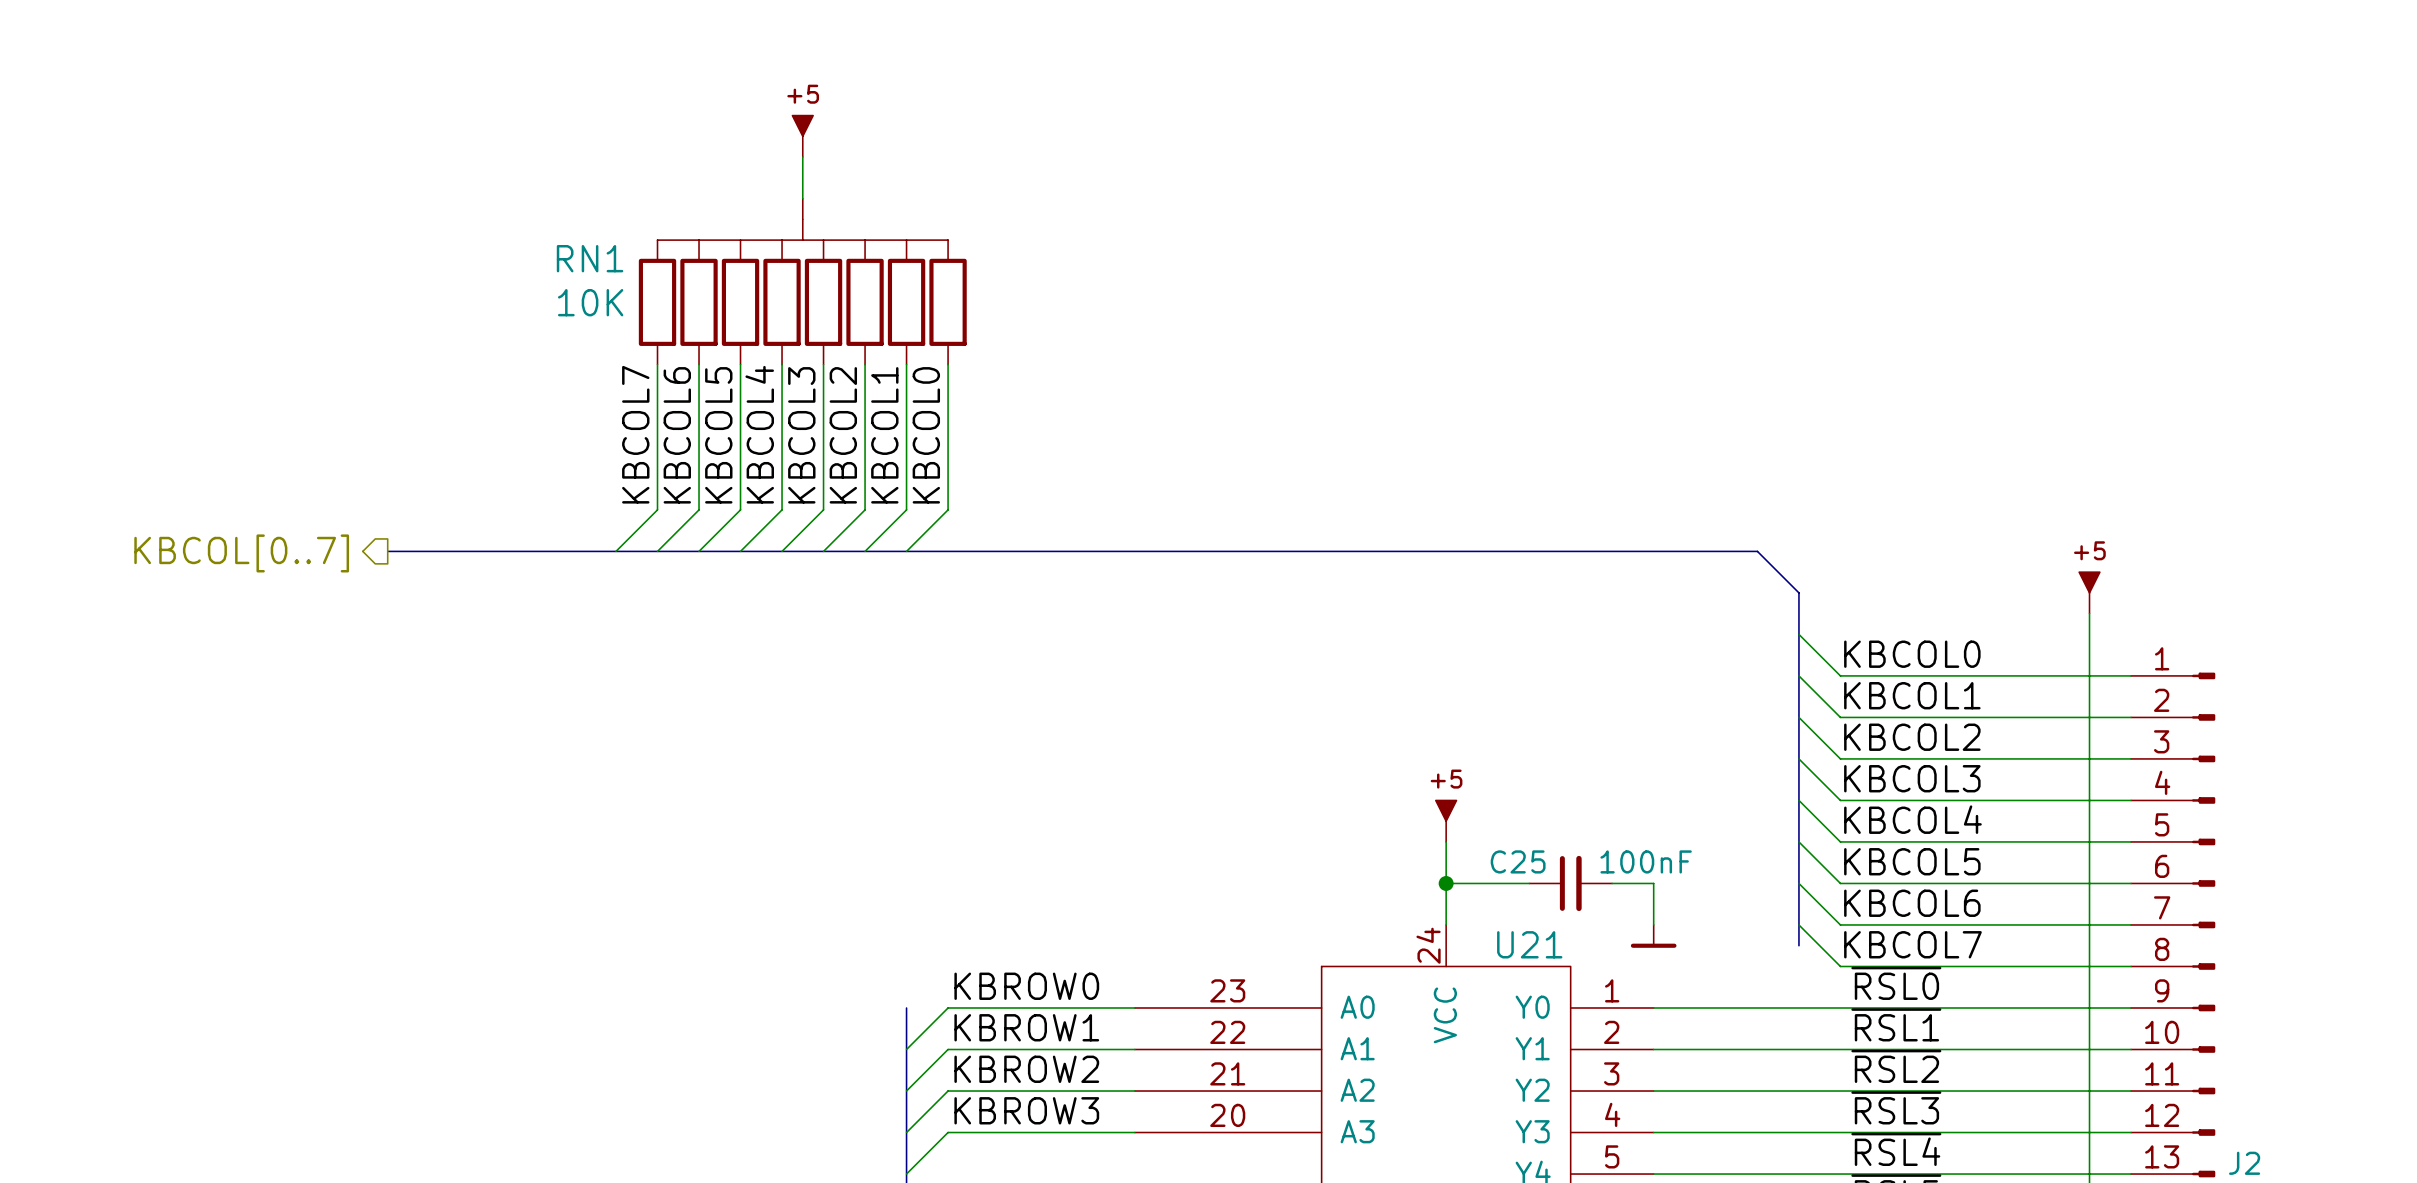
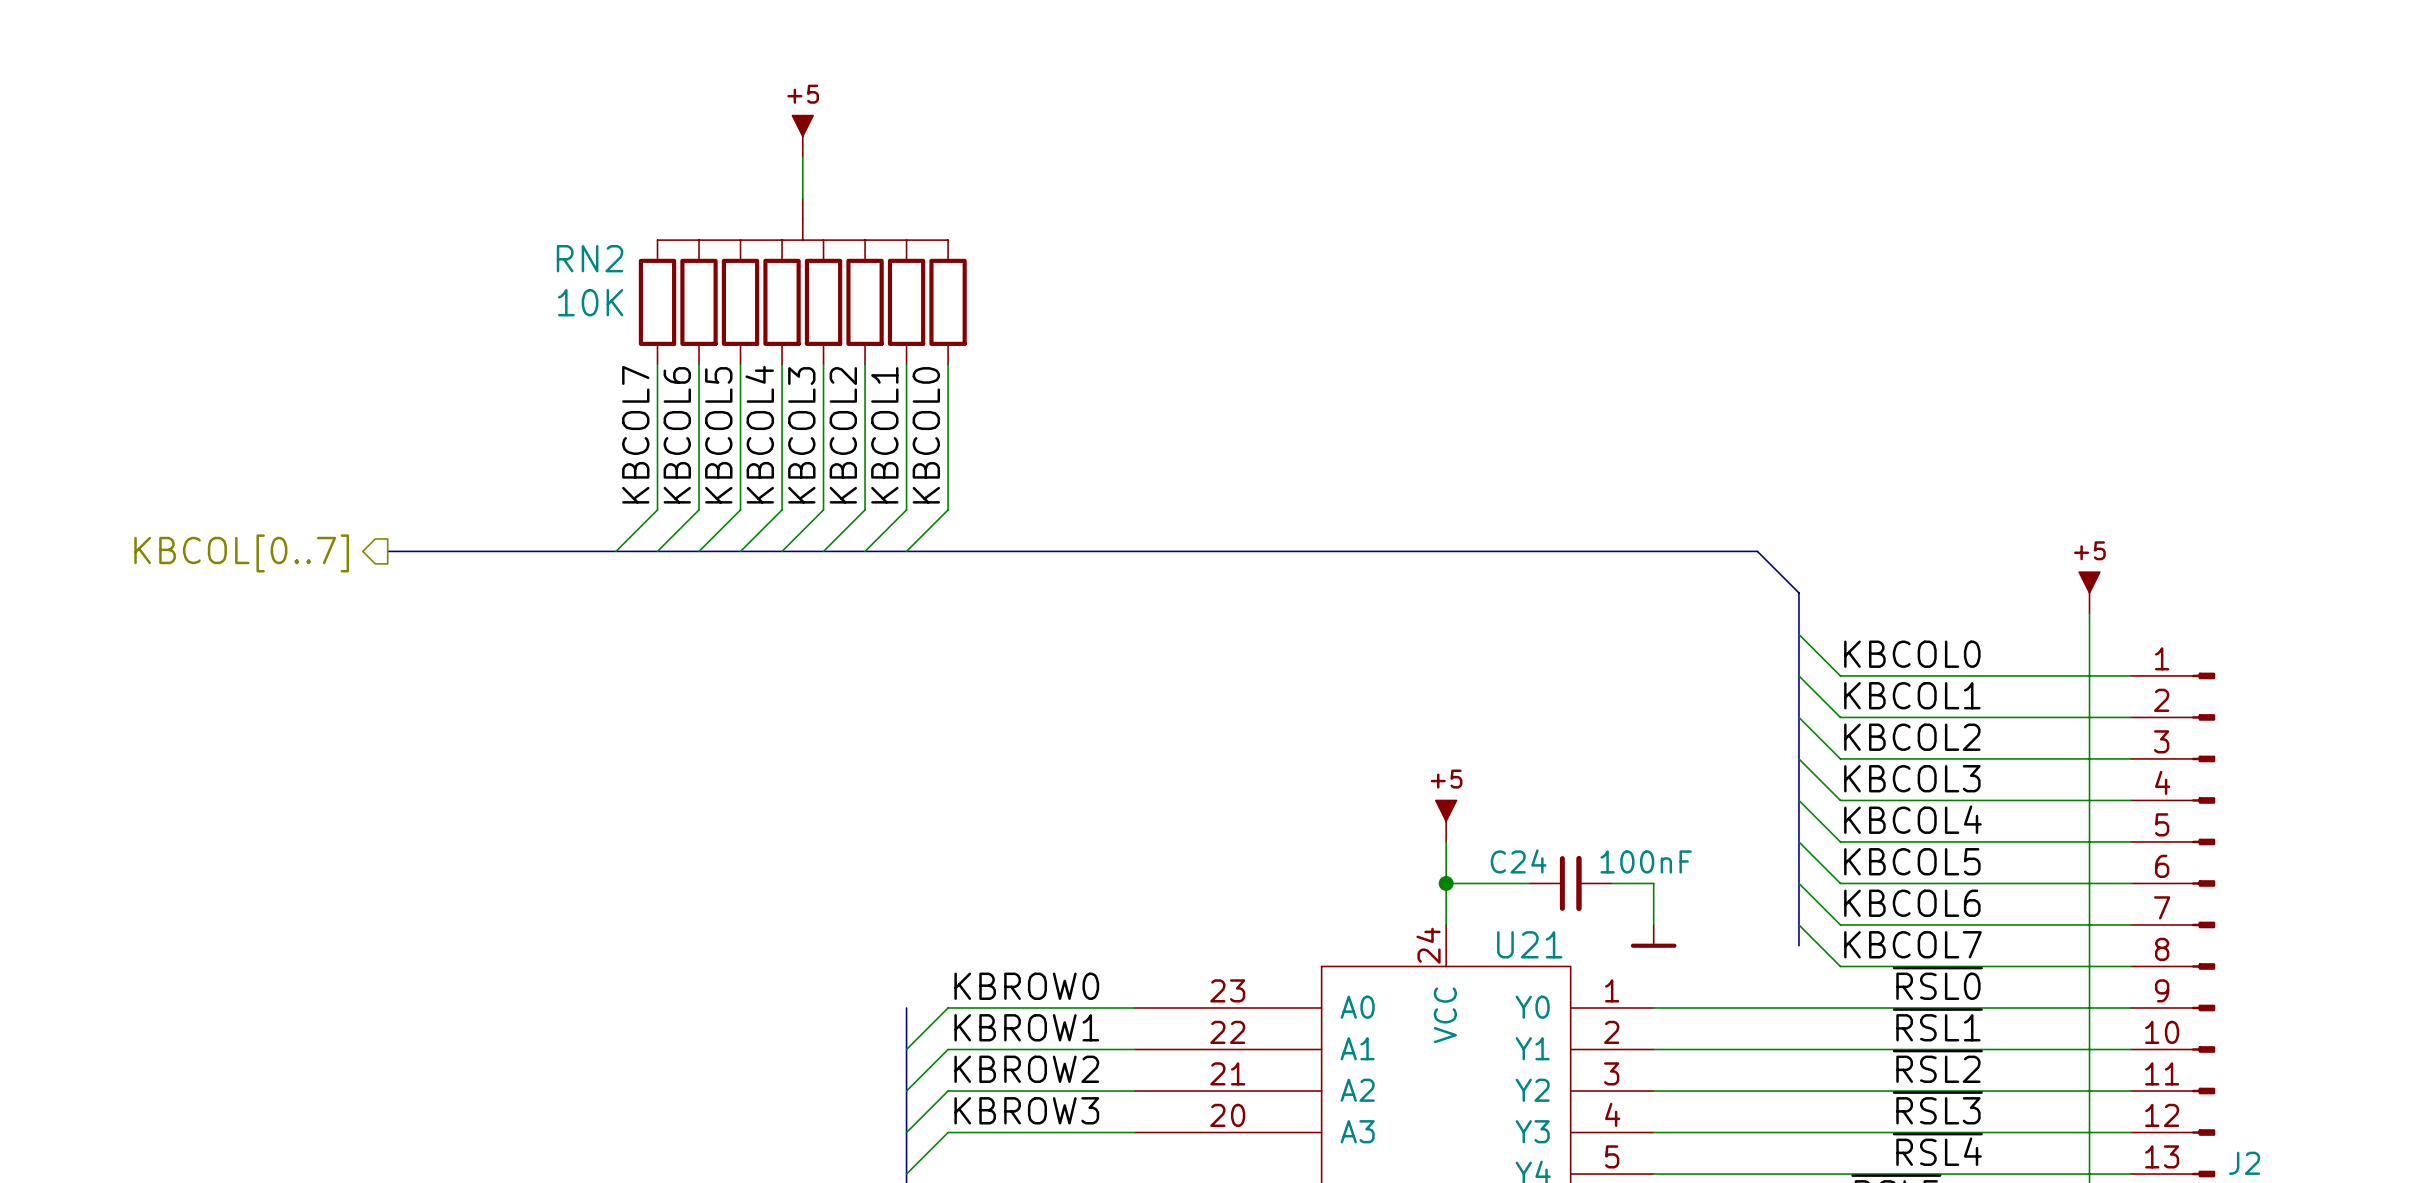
RN1 name: RN1 (590, 258) -> RN2 (590, 258)
C25 name: C25 (1518, 861) -> C24 (1518, 861)
label position: ~{RSL0} (1896, 983) -> ~{RSL0} (1937, 983)
label position: ~{RSL1} (1896, 1024) -> ~{RSL1} (1937, 1024)
label position: ~{RSL2} (1896, 1066) -> ~{RSL2} (1937, 1066)
label position: ~{RSL3} (1896, 1107) -> ~{RSL3} (1937, 1107)
label position: ~{RSL4} (1896, 1149) -> ~{RSL4} (1937, 1149)

